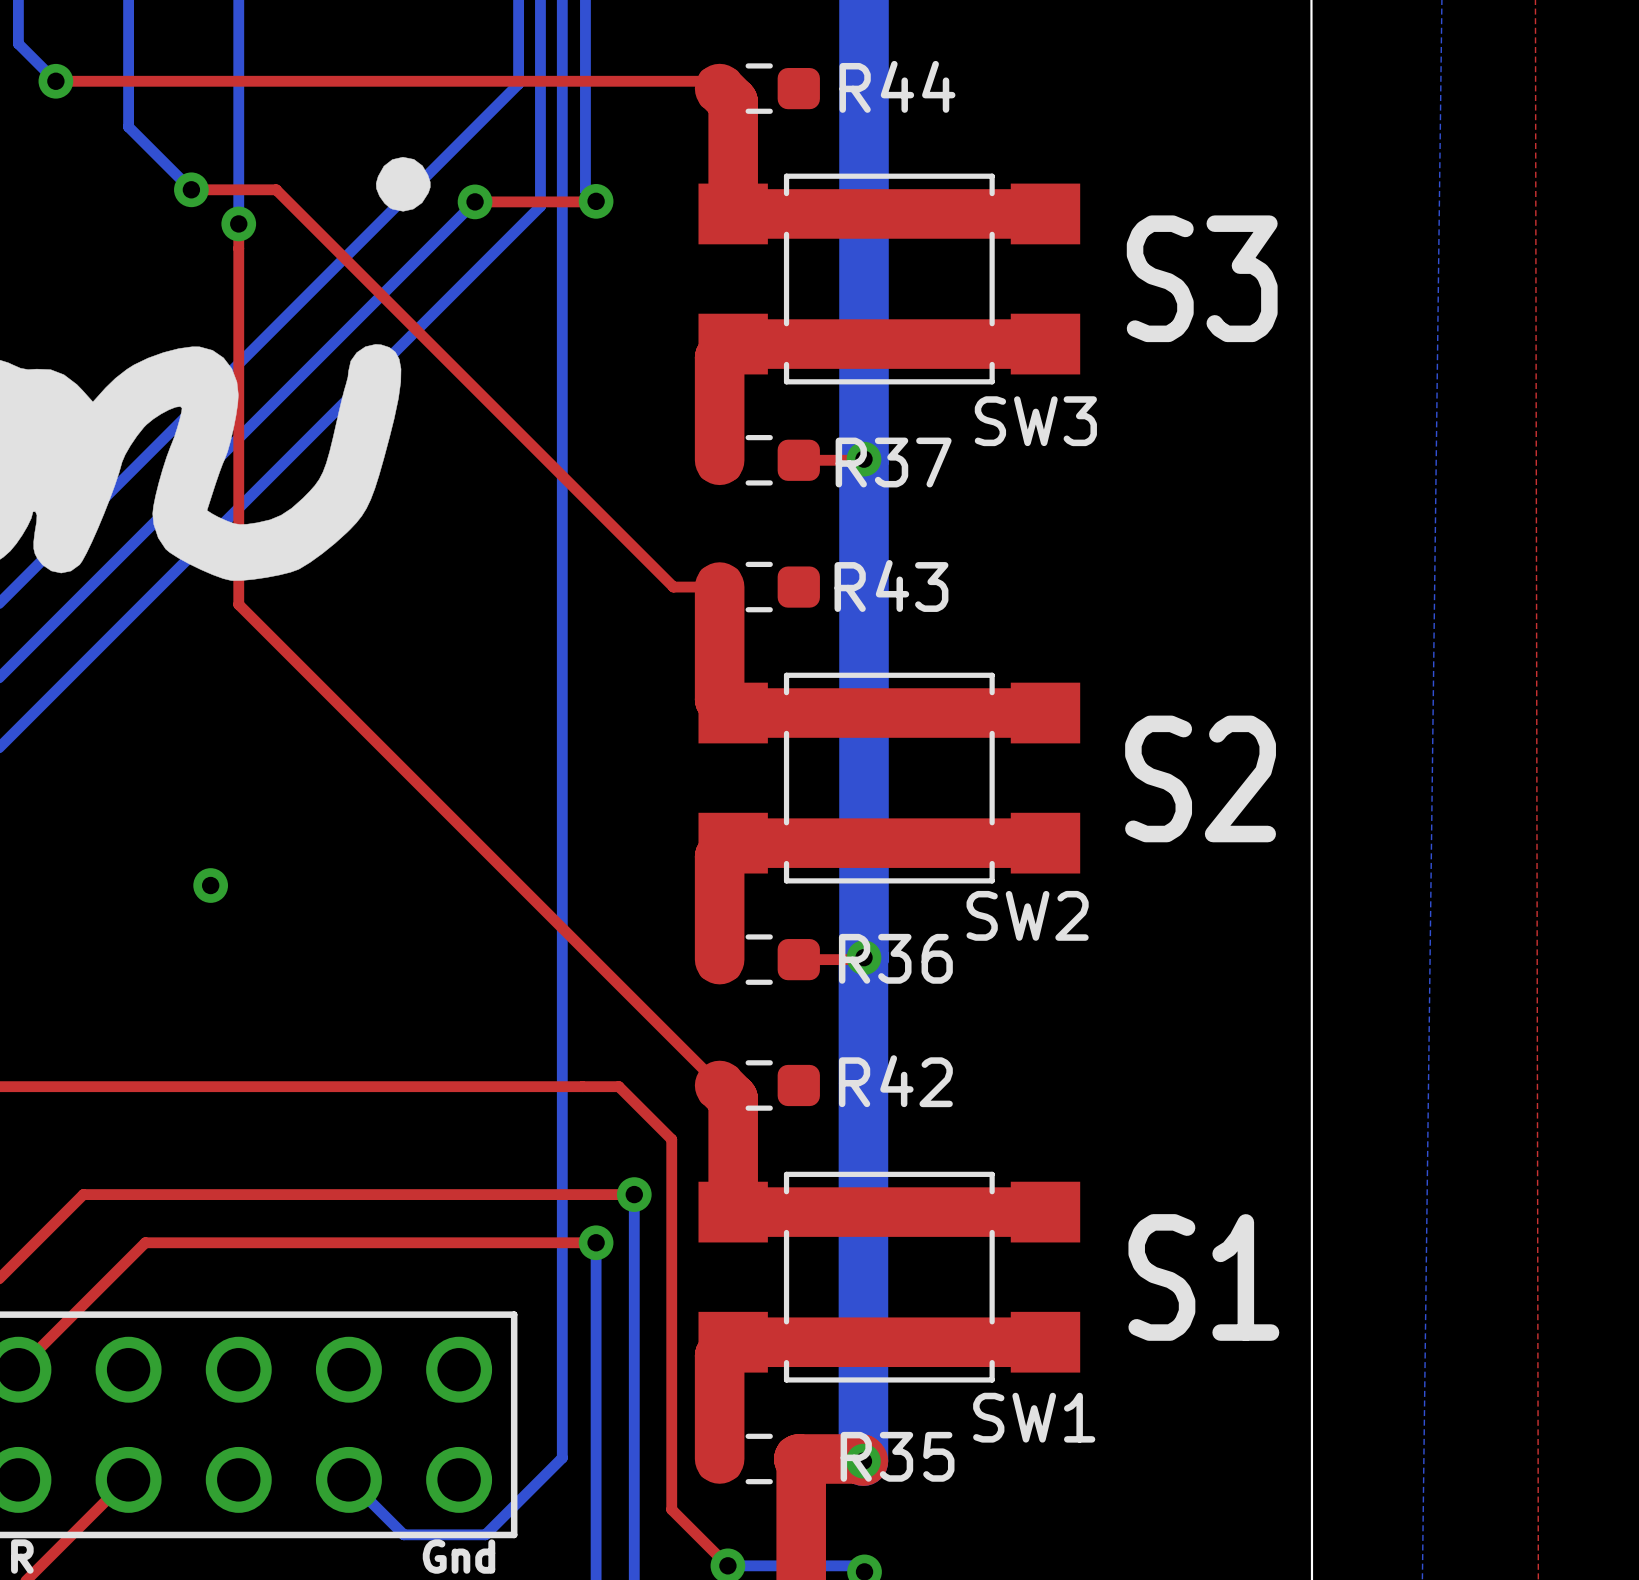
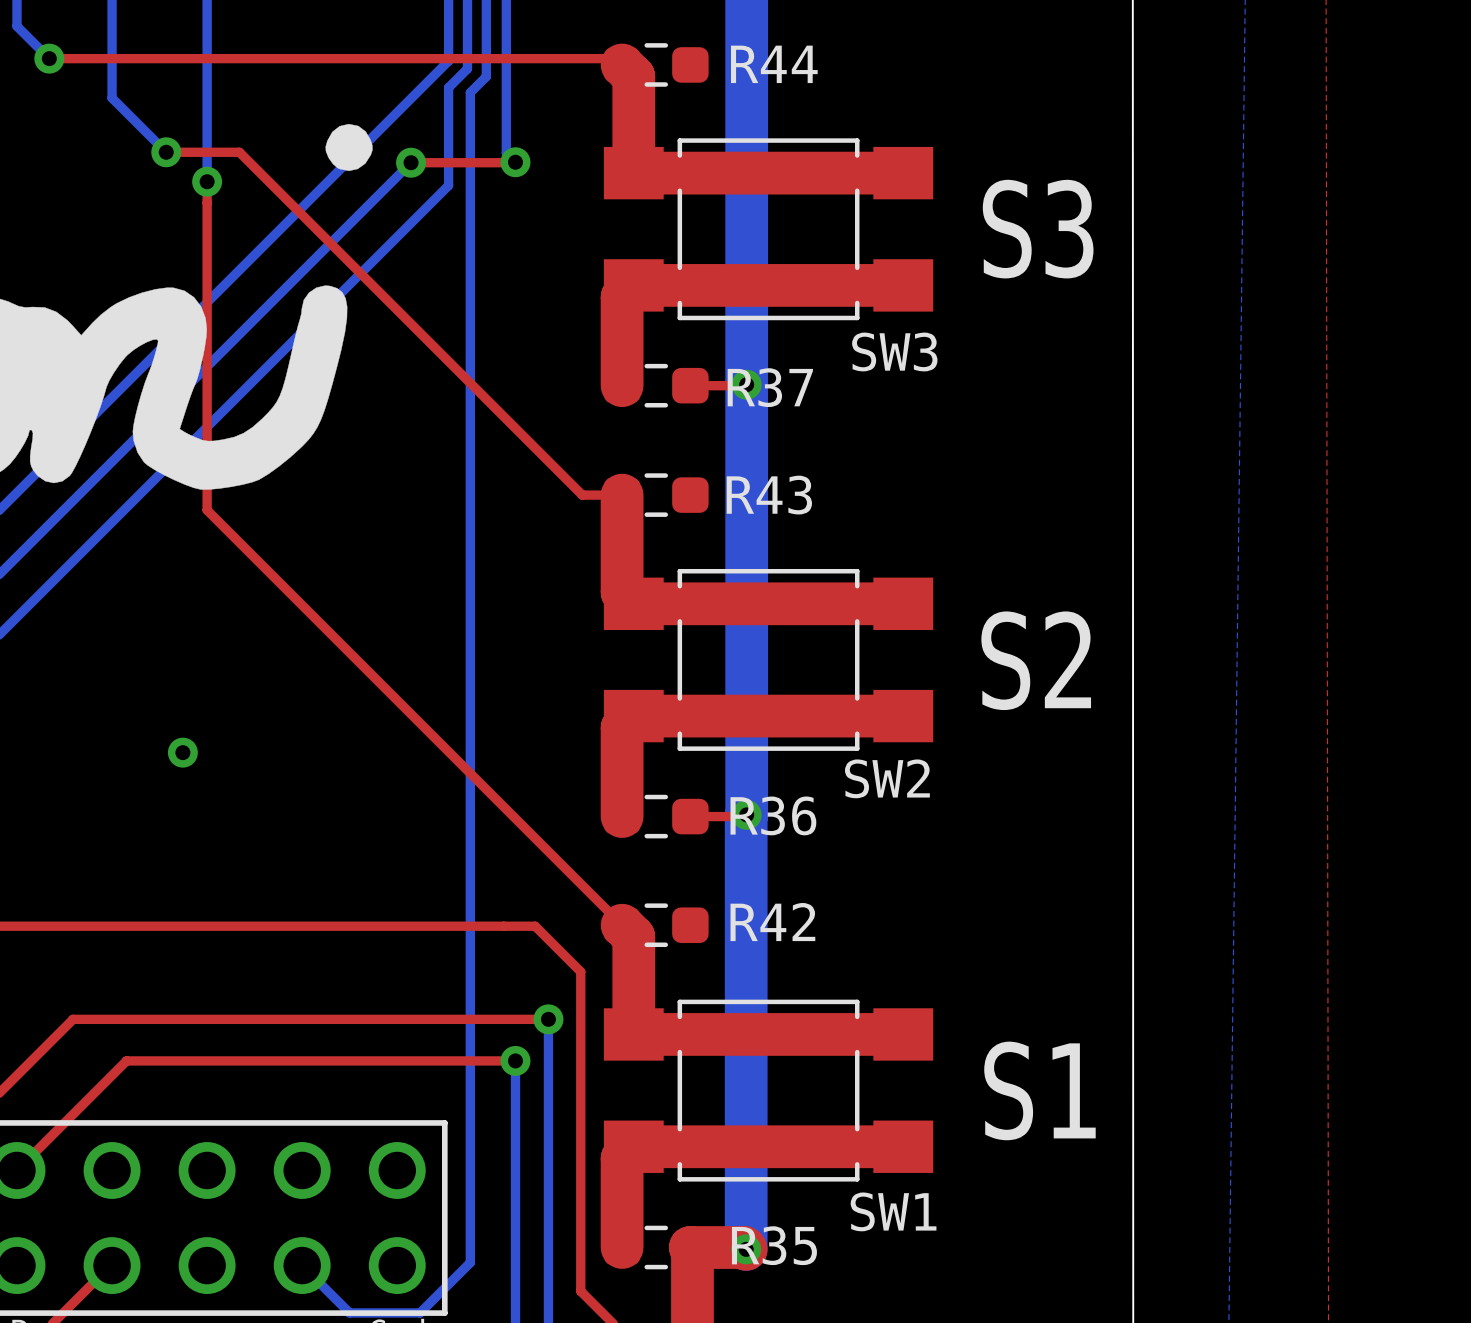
bottom track: (540, 93) (540, 206) (518, 228) -> (467, 68) (448, 87) (448, 185)
bottom track: (562, 102) (562, 1457) (543, 1476) -> (486, 76) (470, 92) (470, 1262)

